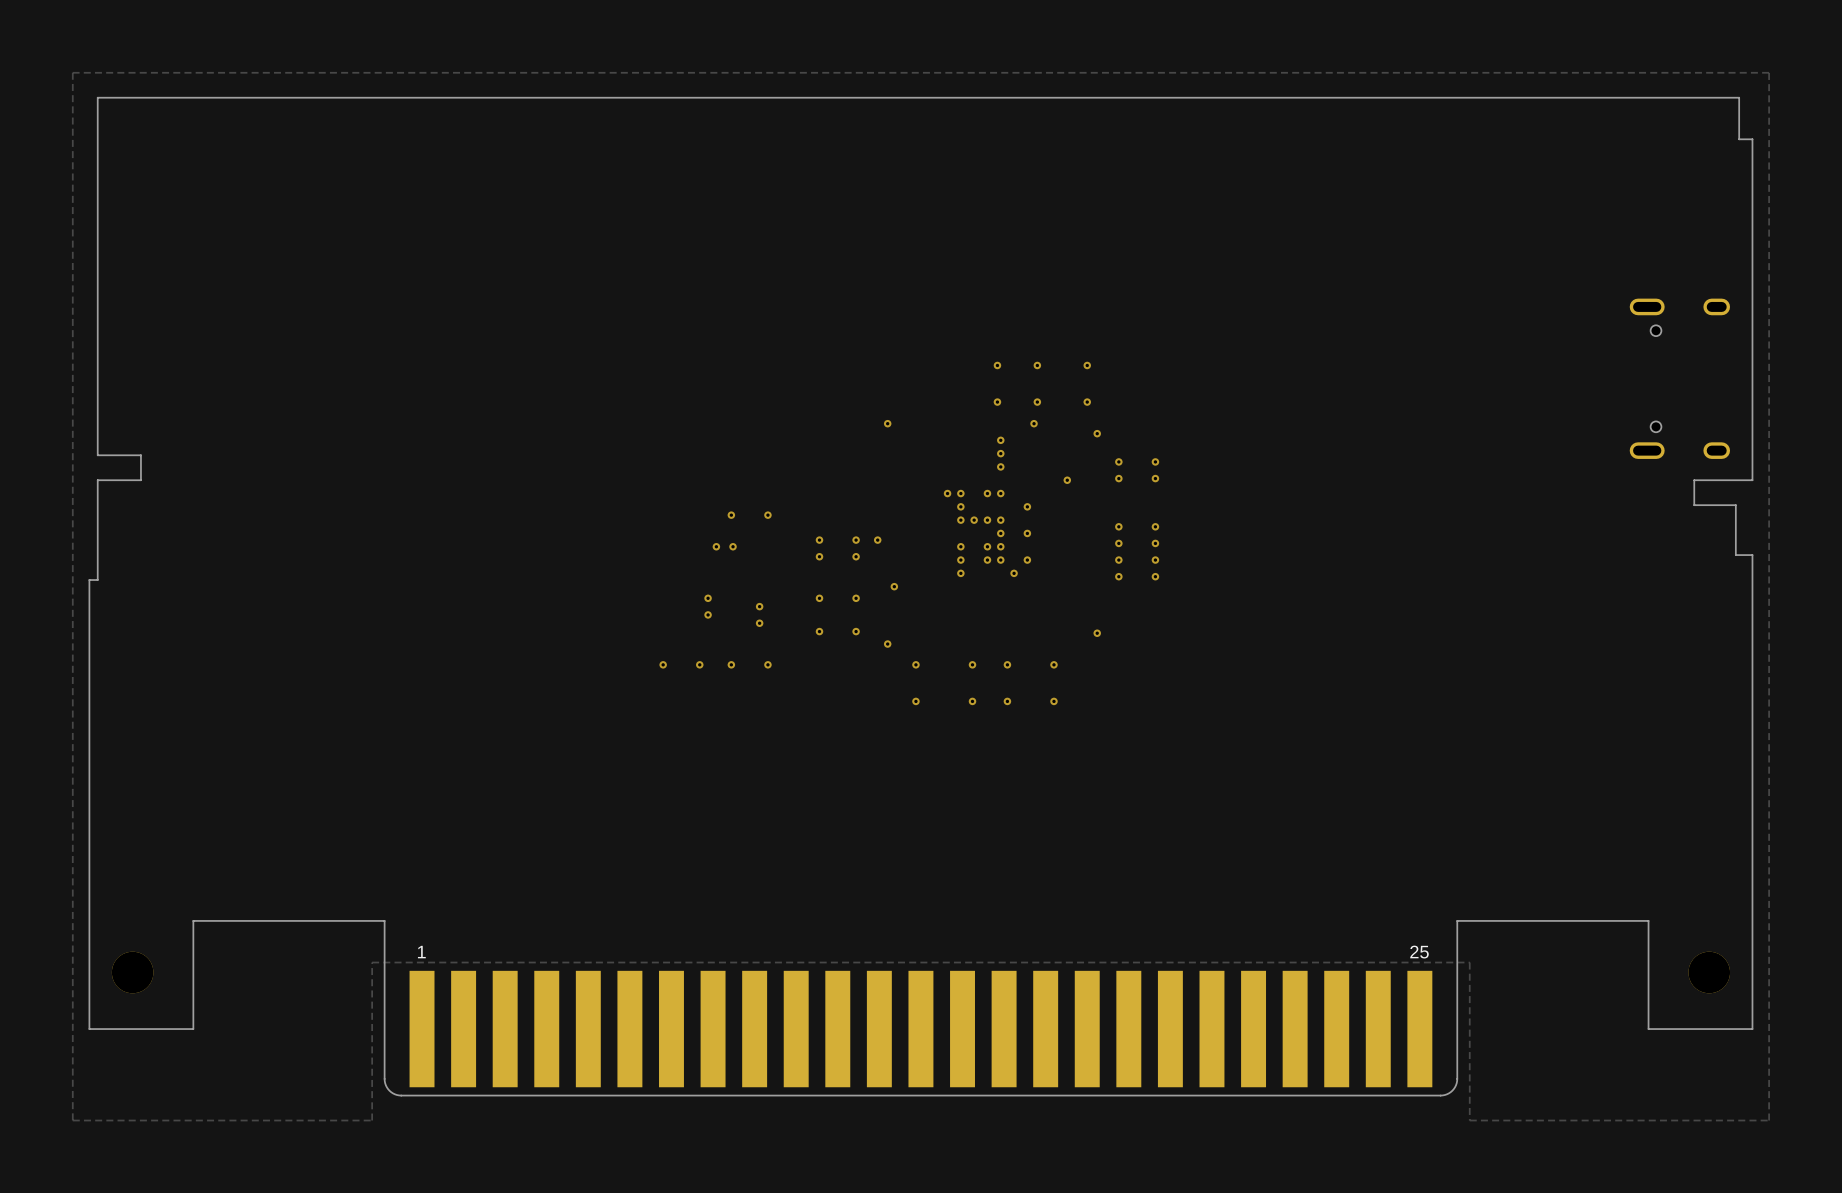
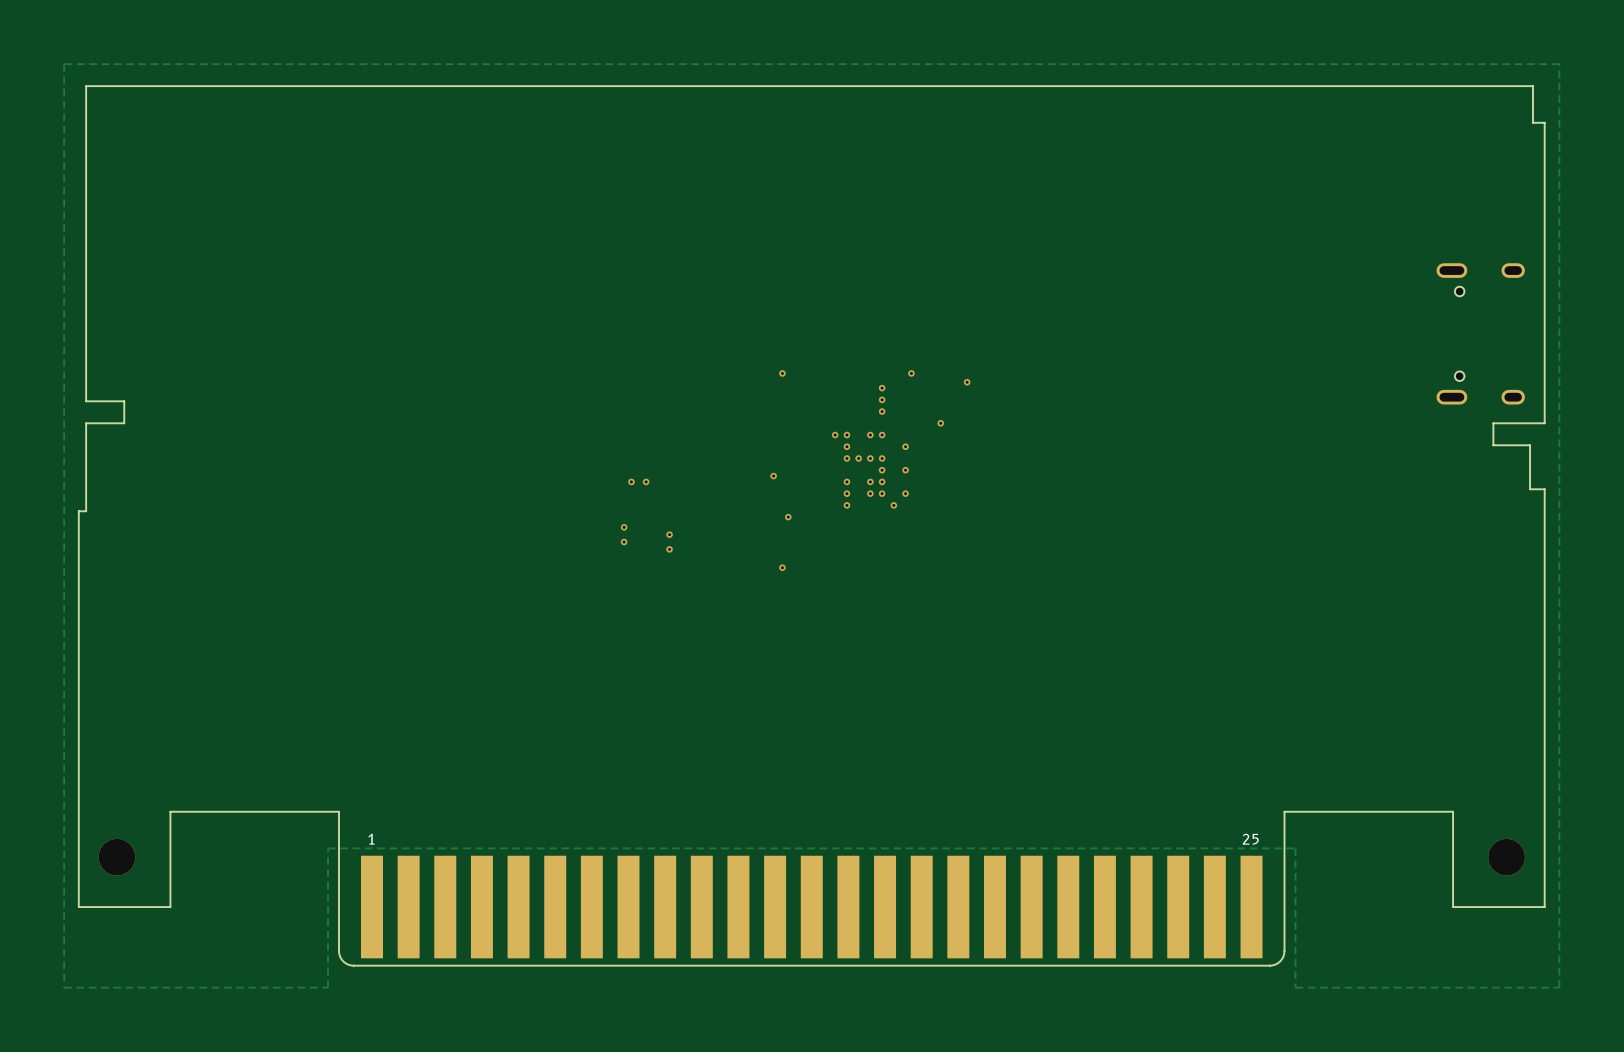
via: (997, 365) -> none
via: (1037, 365) -> none
via: (1087, 365) -> none
via: (997, 402) -> none
via: (1037, 402) -> none
via: (1087, 402) -> none
via: (1118, 461) -> none
via: (1155, 461) -> none
via: (1118, 478) -> none
via: (1155, 478) -> none
via: (731, 515) -> none
via: (767, 515) -> none
via: (1118, 526) -> none
via: (1155, 526) -> none
via: (819, 540) -> none
via: (856, 540) -> none
via: (1118, 543) -> none
via: (1155, 543) -> none
via: (819, 556) -> none
via: (856, 556) -> none
via: (1118, 560) -> none
via: (1155, 560) -> none
via: (1118, 576) -> none
via: (1155, 576) -> none
via: (819, 598) -> none
via: (856, 598) -> none
via: (819, 631) -> none
via: (856, 631) -> none
via: (1097, 633) -> none
via: (663, 664) -> none
via: (699, 664) -> none
via: (731, 664) -> none
via: (767, 664) -> none
via: (915, 664) -> none
via: (972, 664) -> none
via: (1007, 664) -> none
via: (1053, 664) -> none
via: (915, 701) -> none
via: (972, 701) -> none
via: (1007, 701) -> none
via: (1053, 701) -> none

